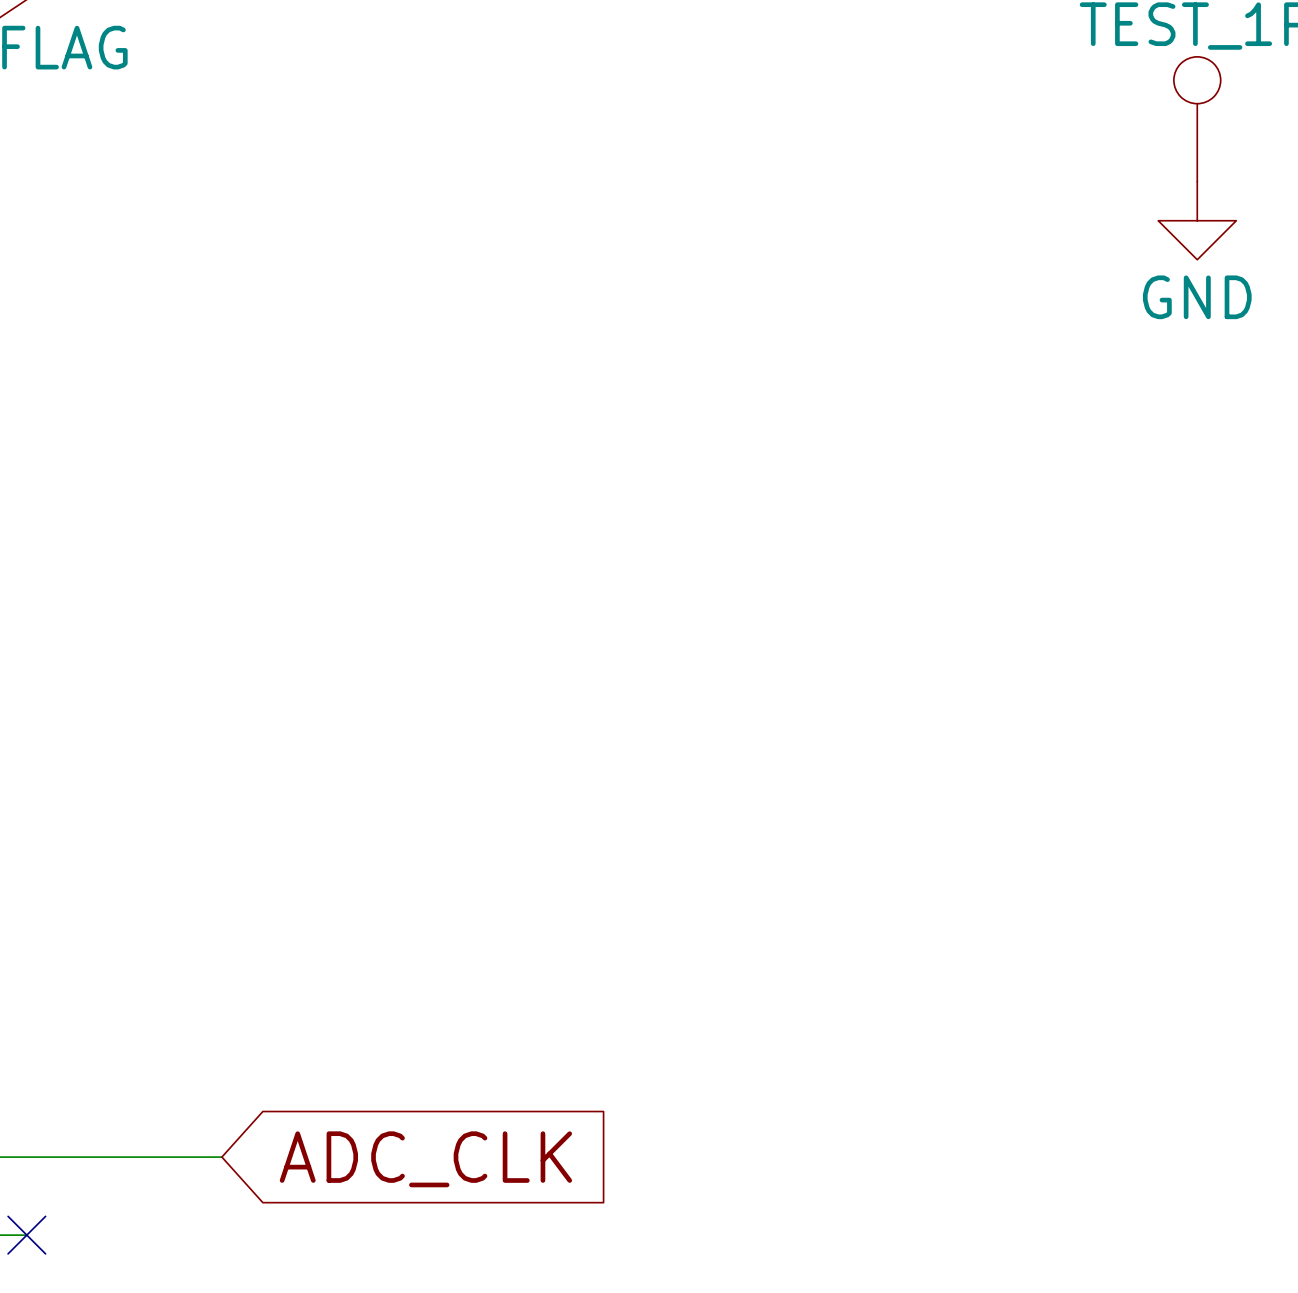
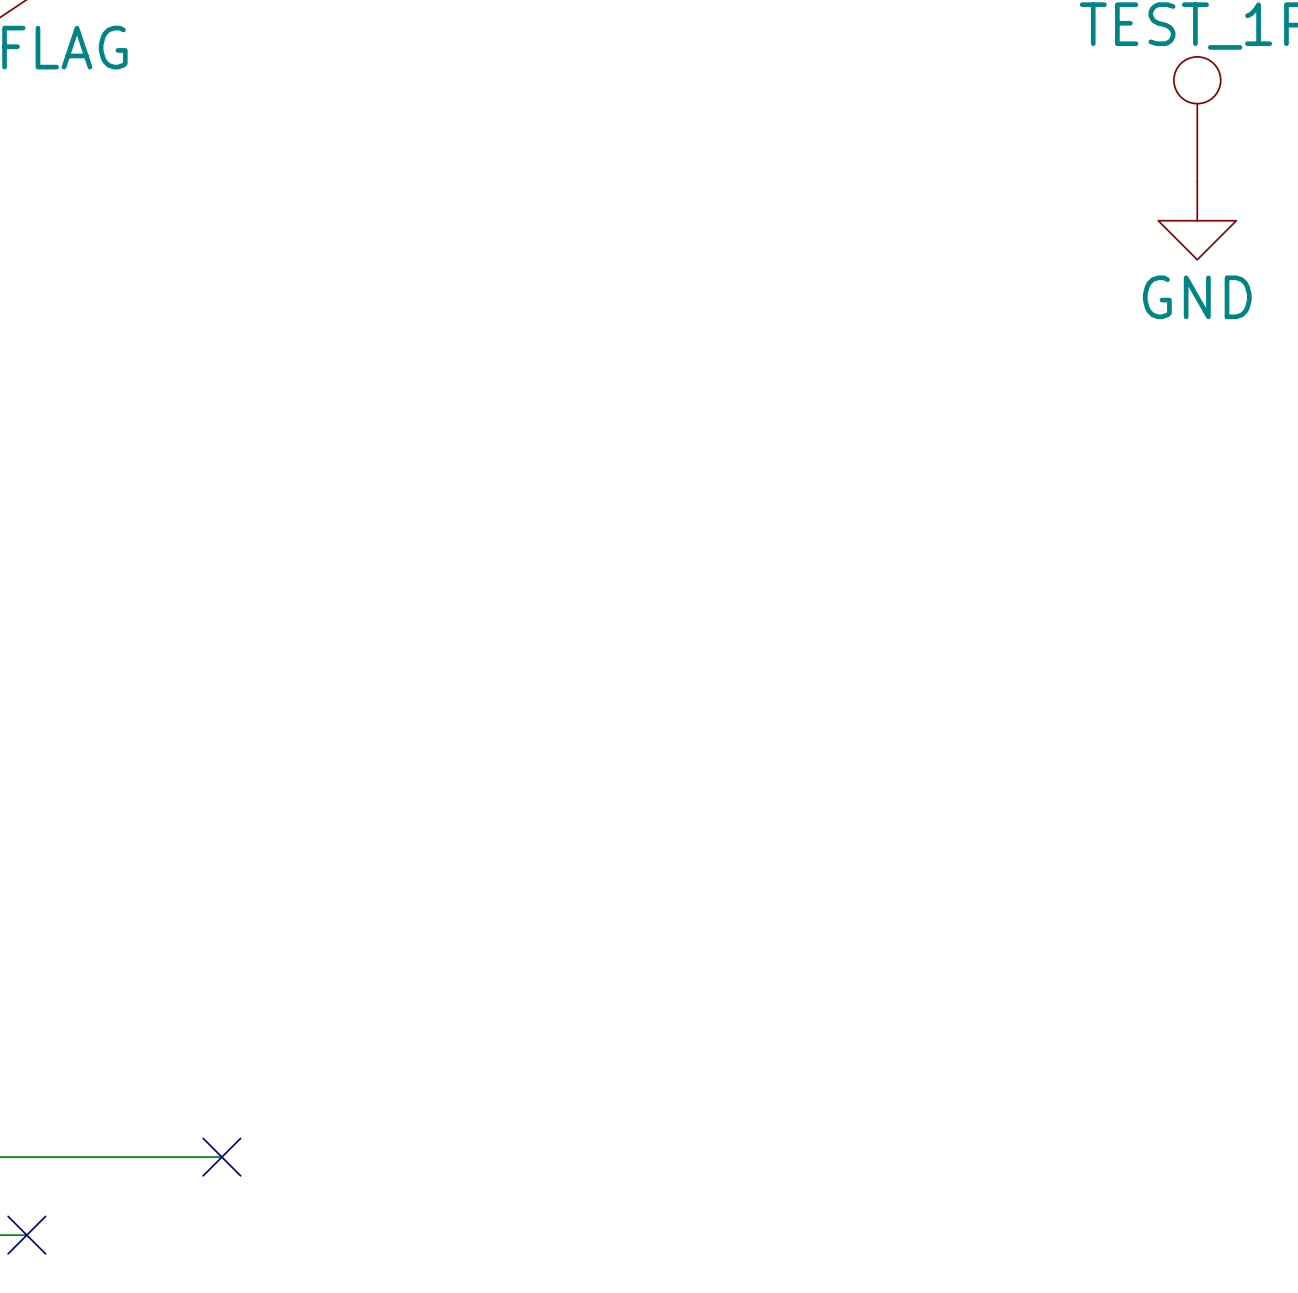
no-connect mark: none -> (221, 1157)
global label: ADC_CLK (425, 1159) -> none

